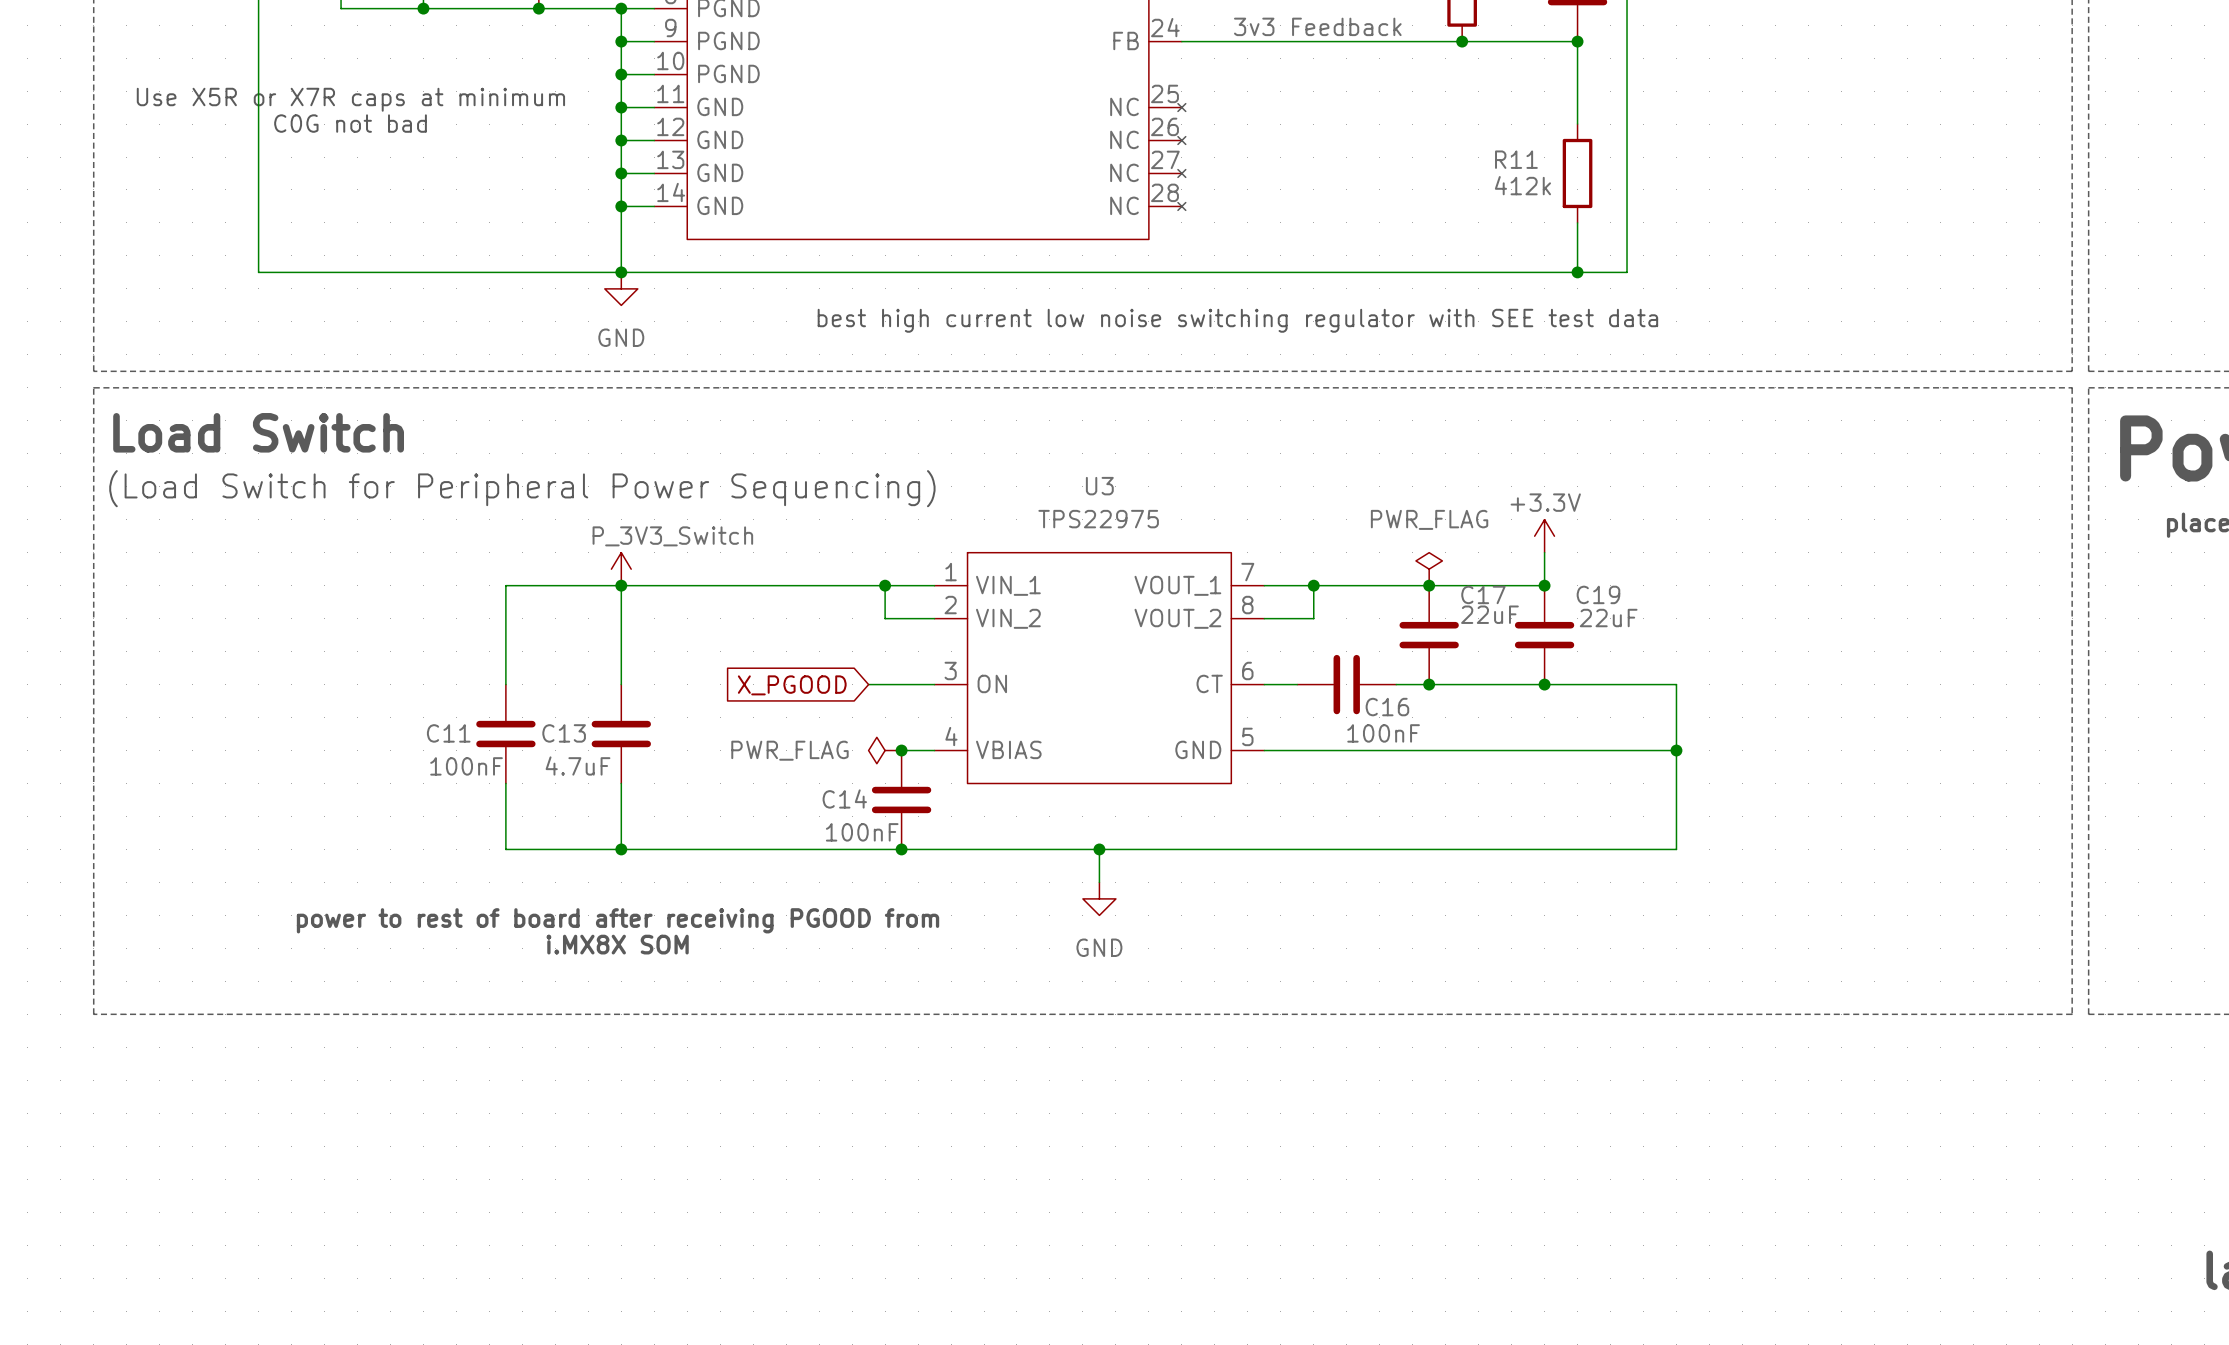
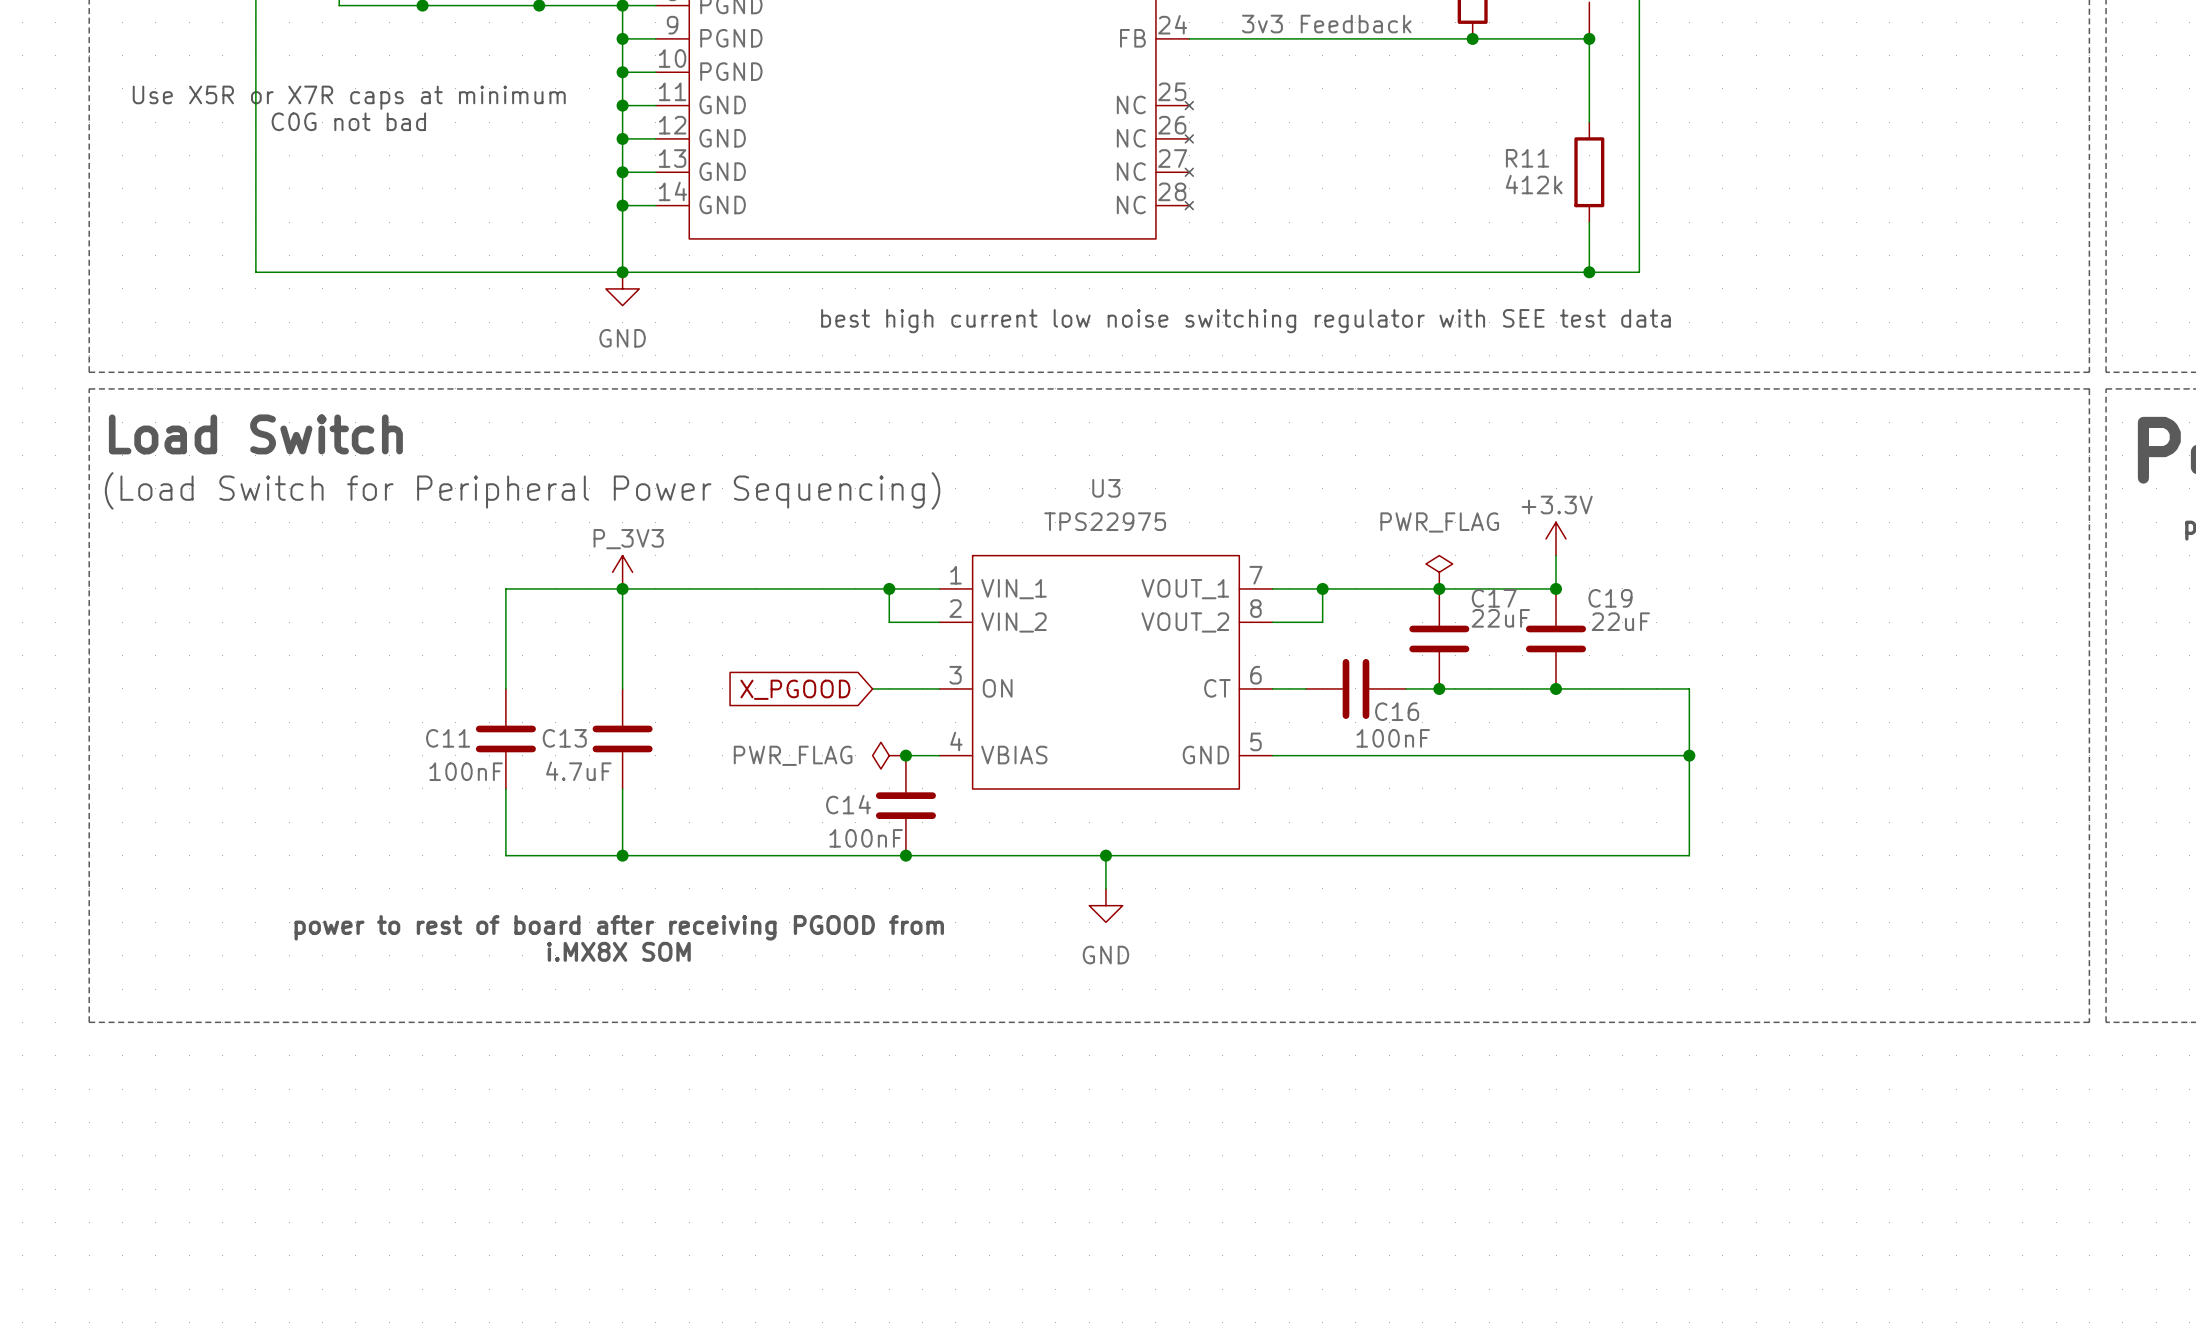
power symbol: P_3V3_Switch (621, 569) -> P_3V3 (622, 572)

